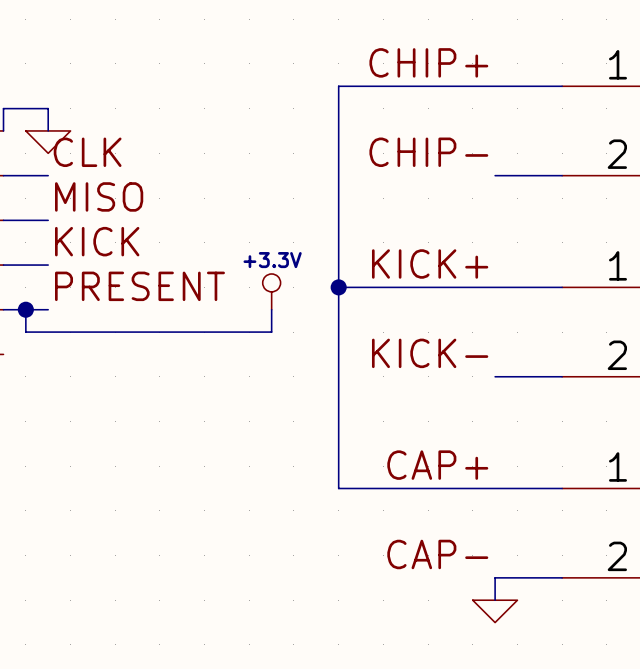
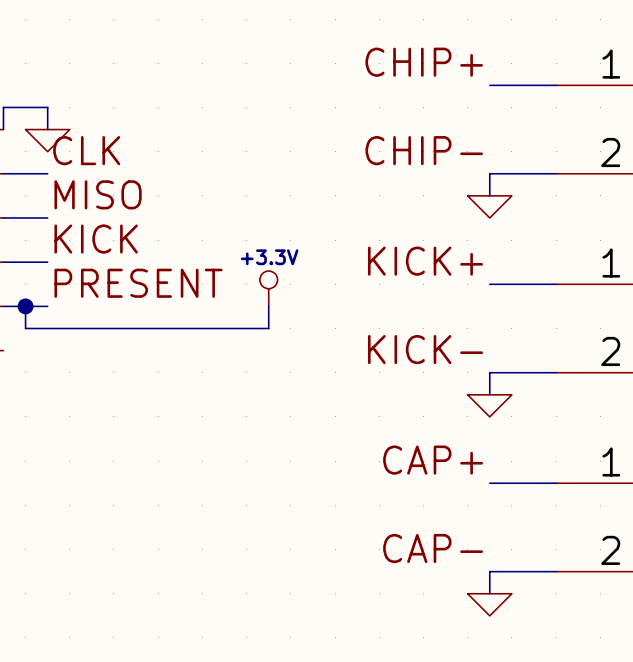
wire: (495, 86) (338, 86) (338, 488) (495, 488) -> none
wire: none -> (489, 173) (489, 195)
power symbol: none -> (489, 206)
wire: (338, 287) (495, 287) -> none
junction: (338, 287) -> none
wire: none -> (489, 372) (489, 394)
power symbol: none -> (489, 405)

